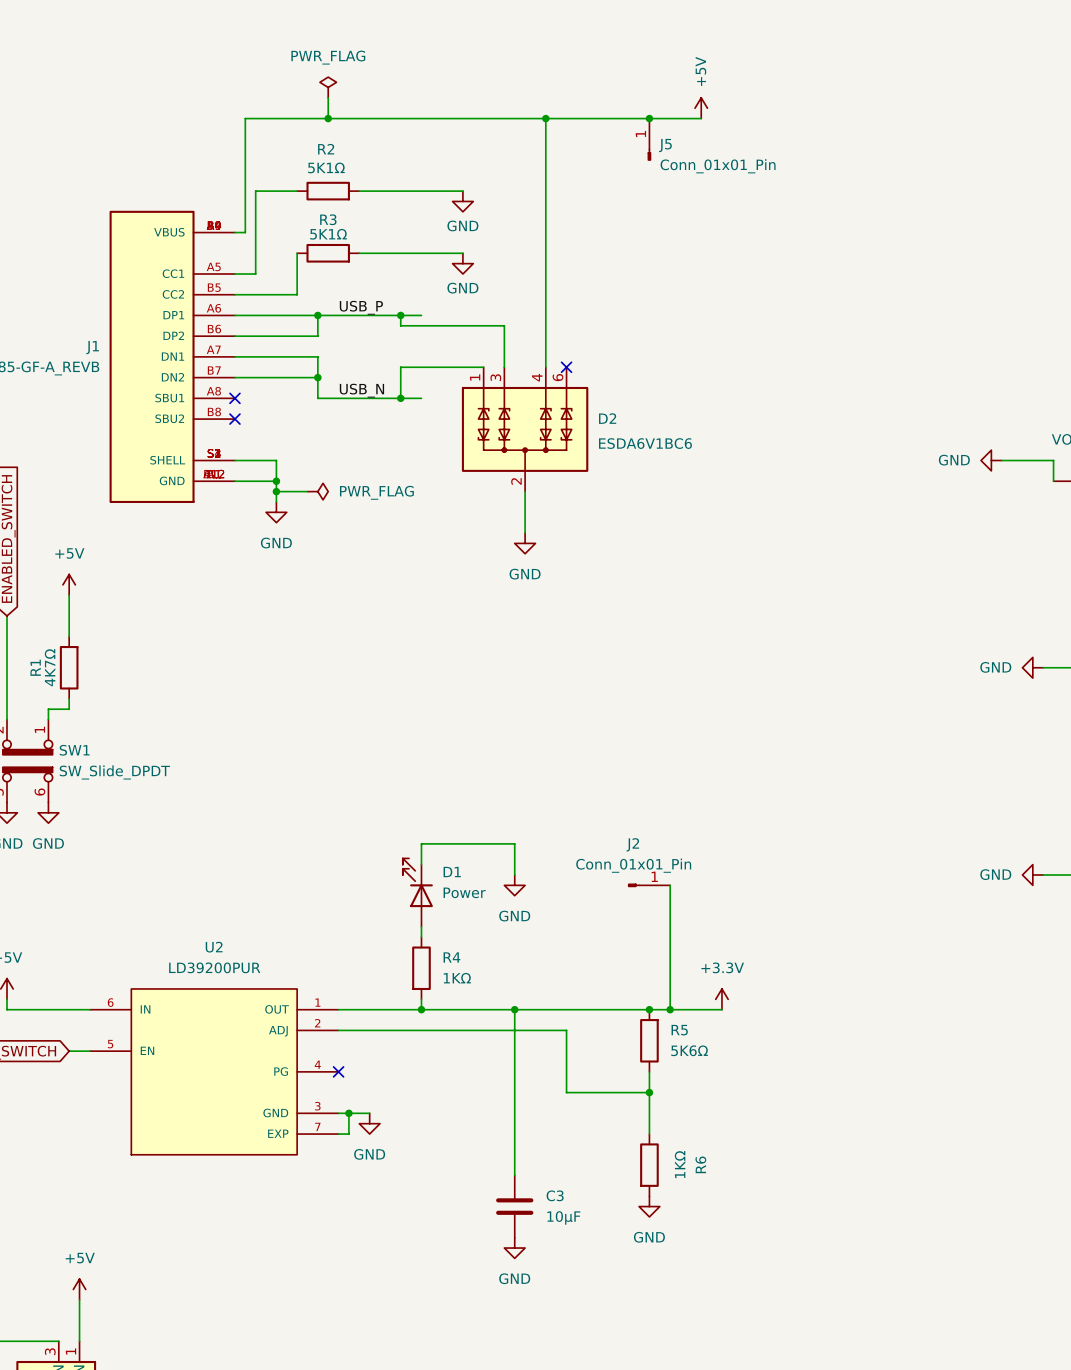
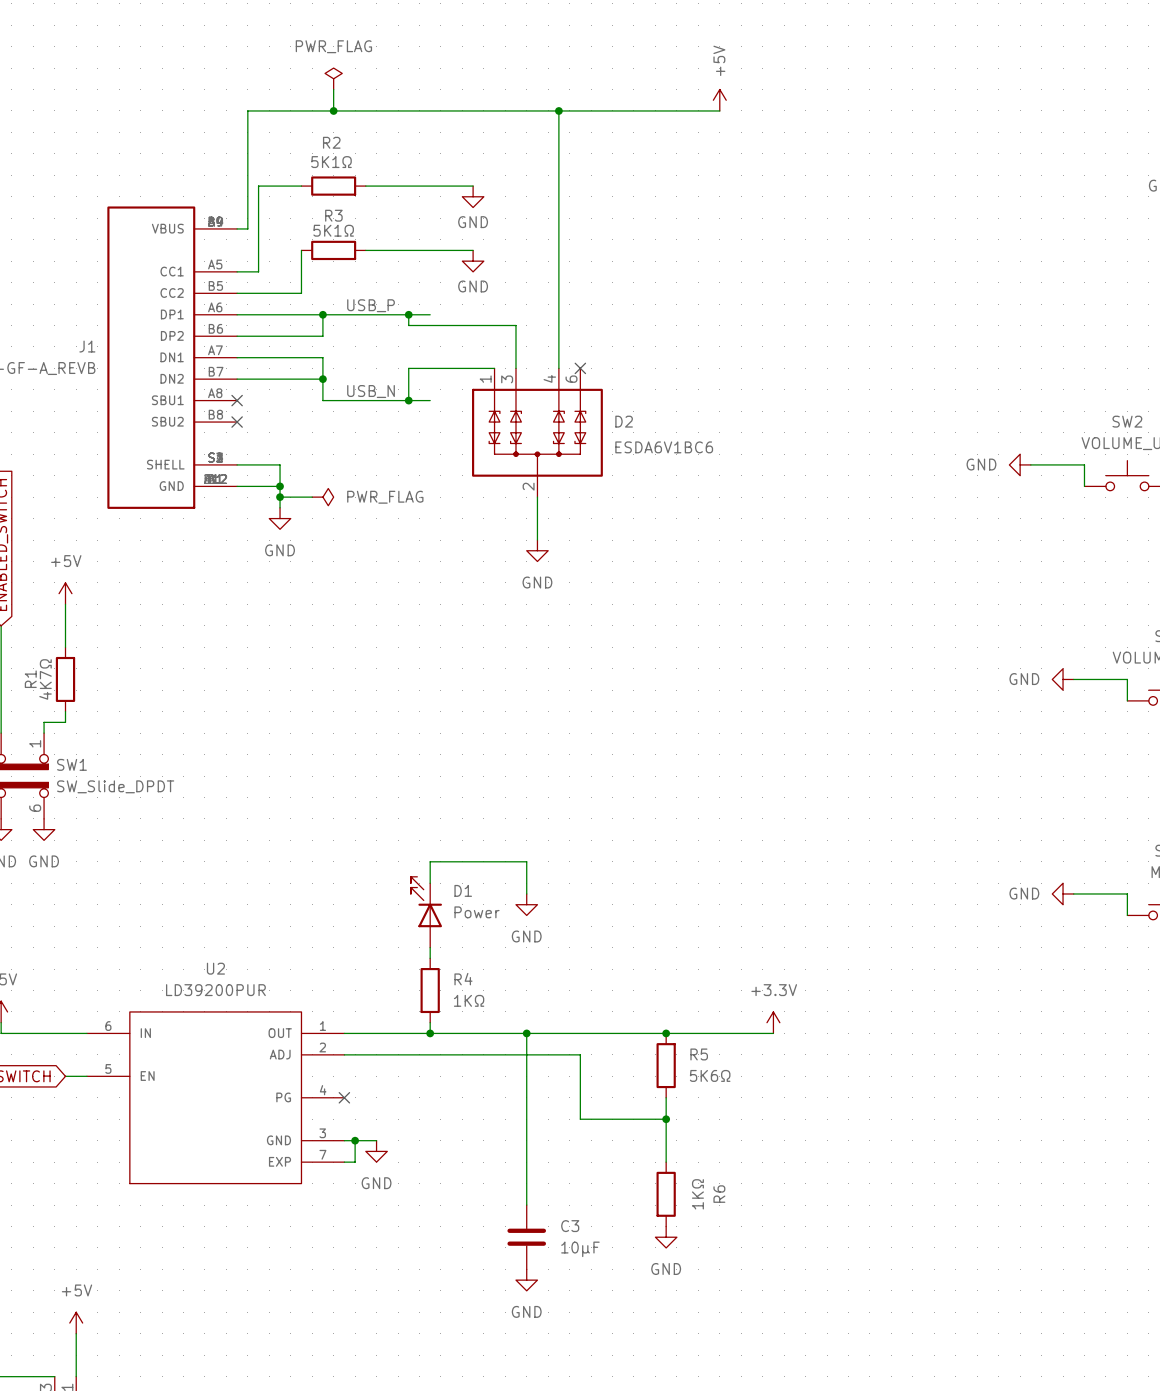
junction: (649, 118) -> none
J5: Conn_01x01_Pin (649, 139) -> none
J2: Conn_01x01_Pin (649, 885) -> none
wire: (670, 885) (670, 1009) -> none
power symbol position: +3.3V (721, 999) -> +3.3V (773, 1022)
junction: (670, 1009) -> none
wire: none -> (741, 1033) (773, 1033)

